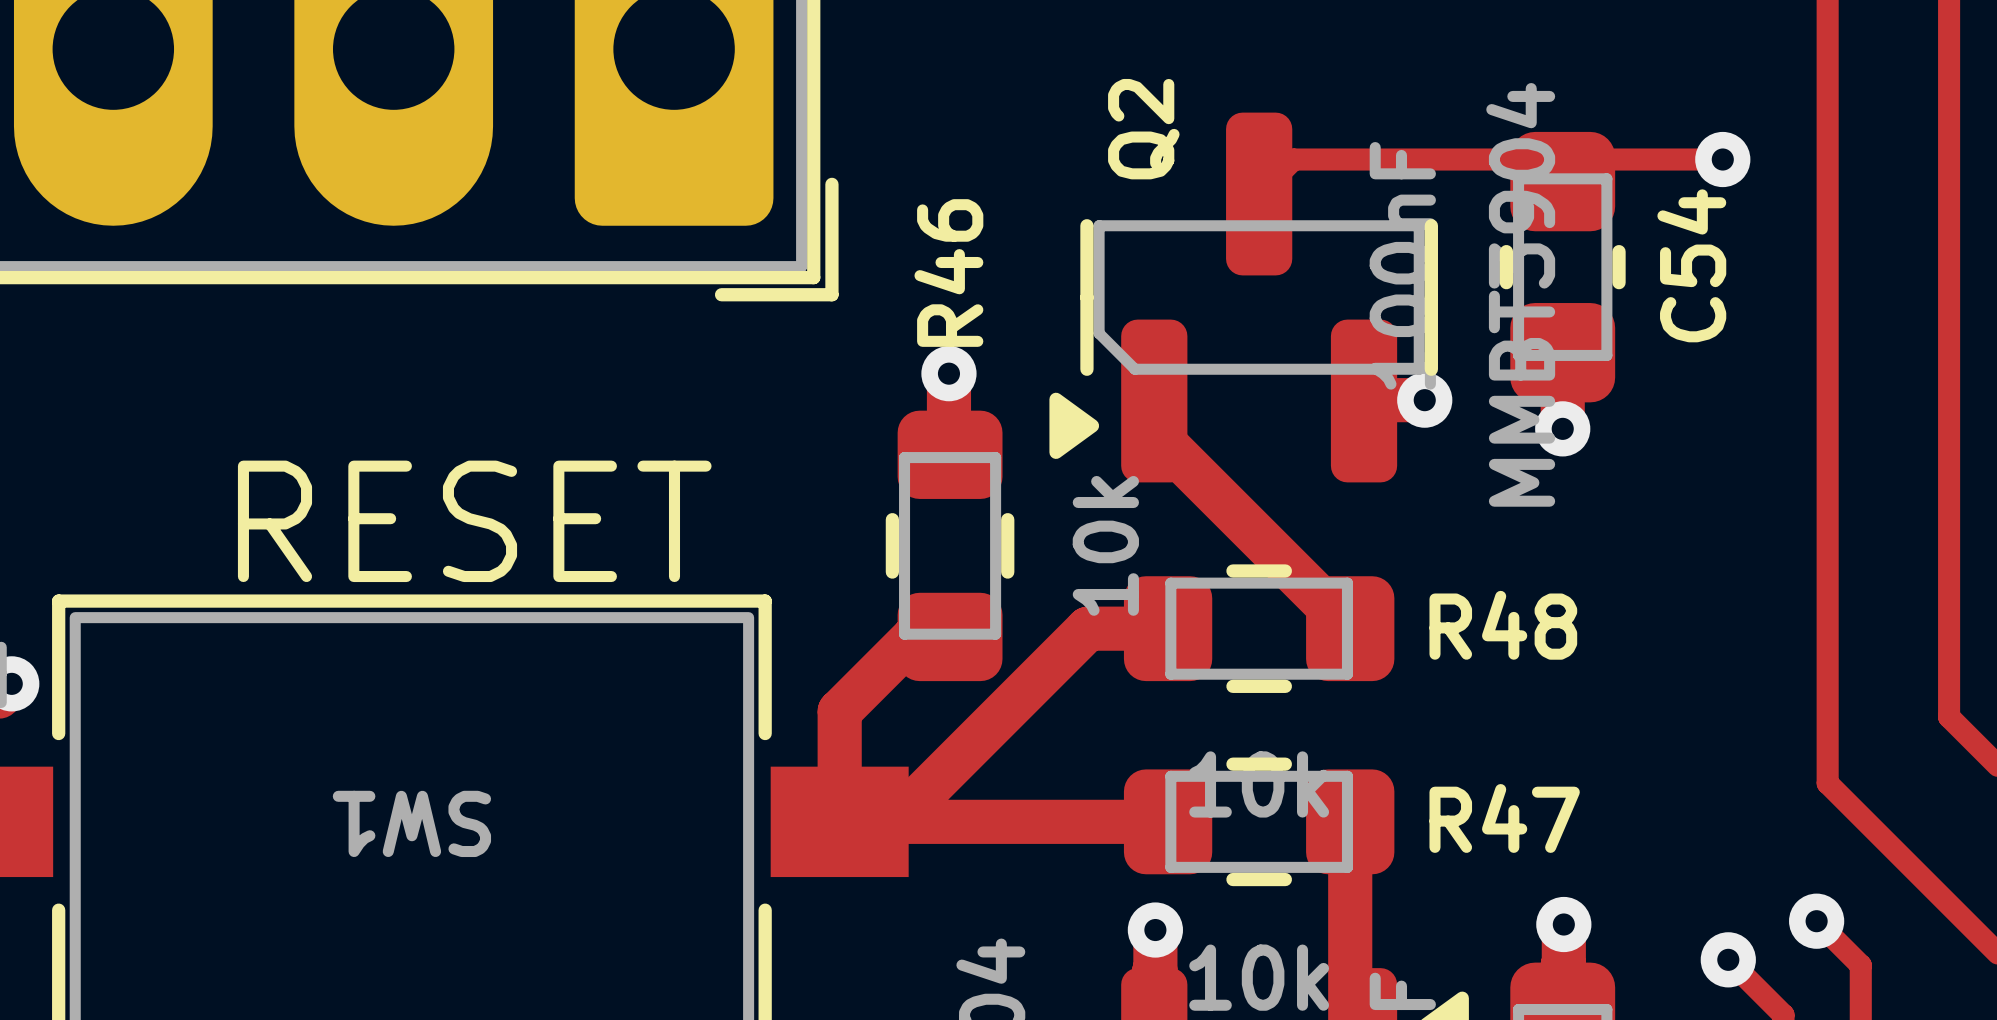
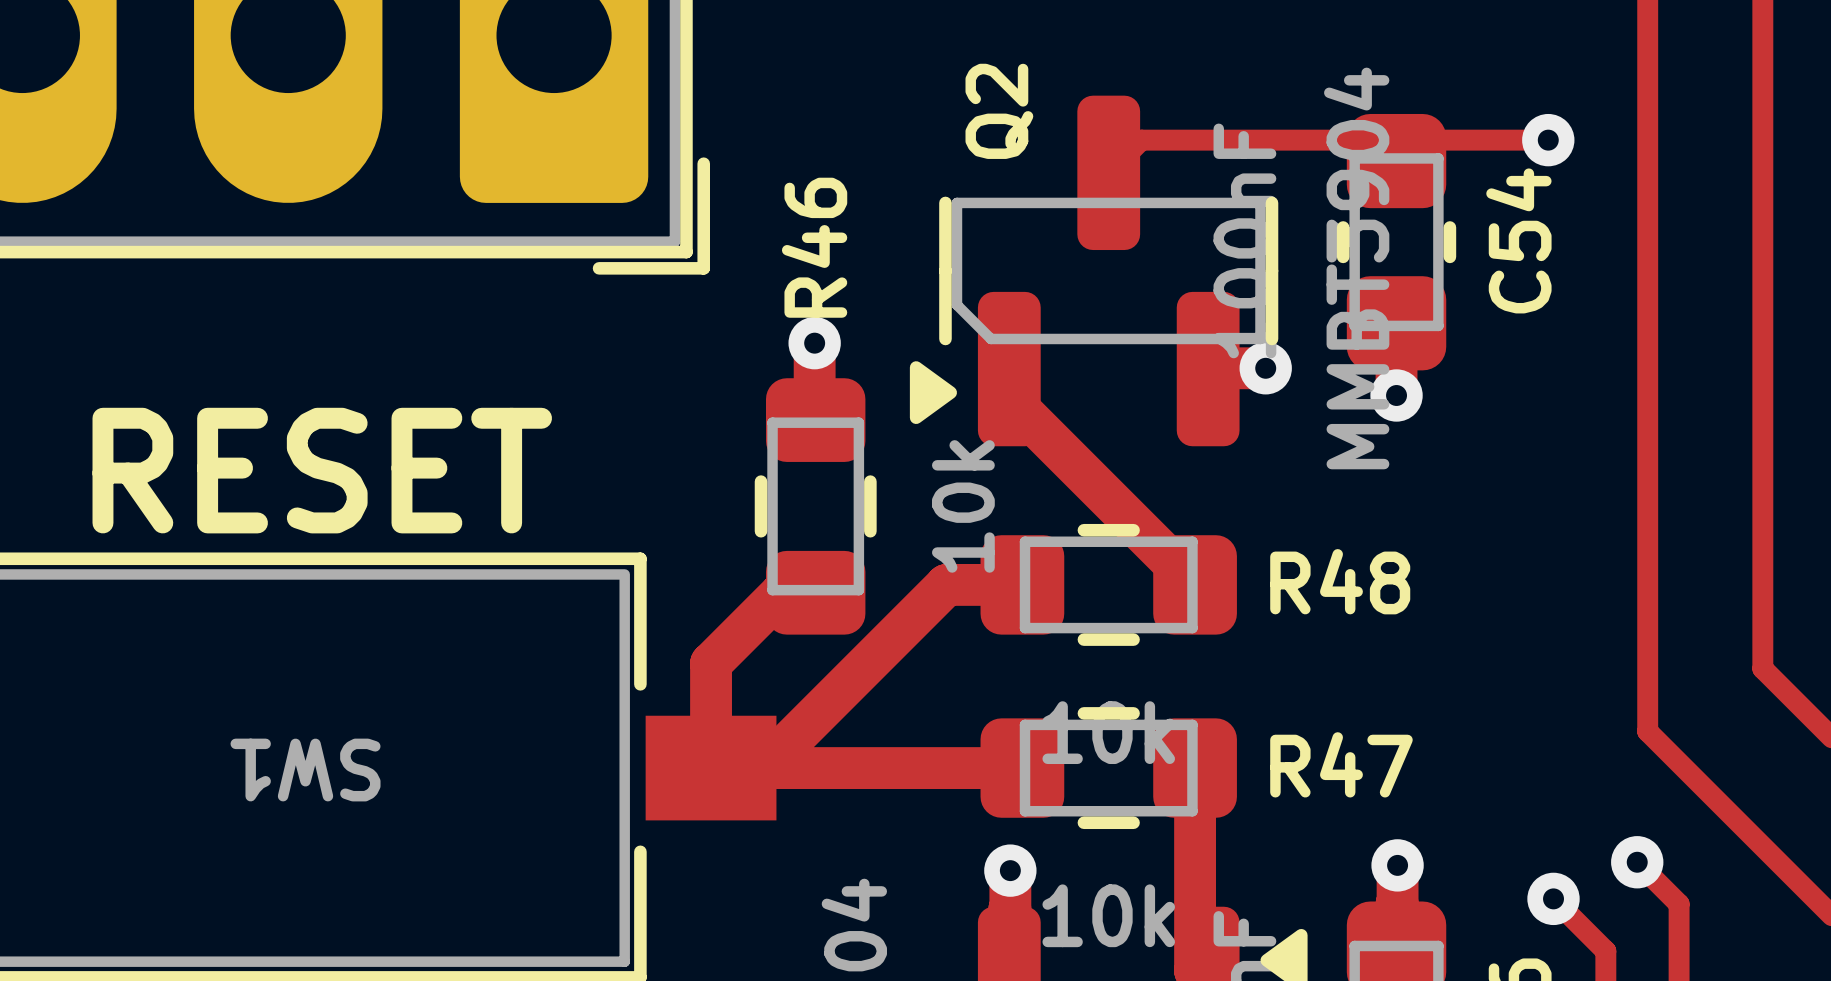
text position: RESET (474, 521) -> RESET (322, 470)

